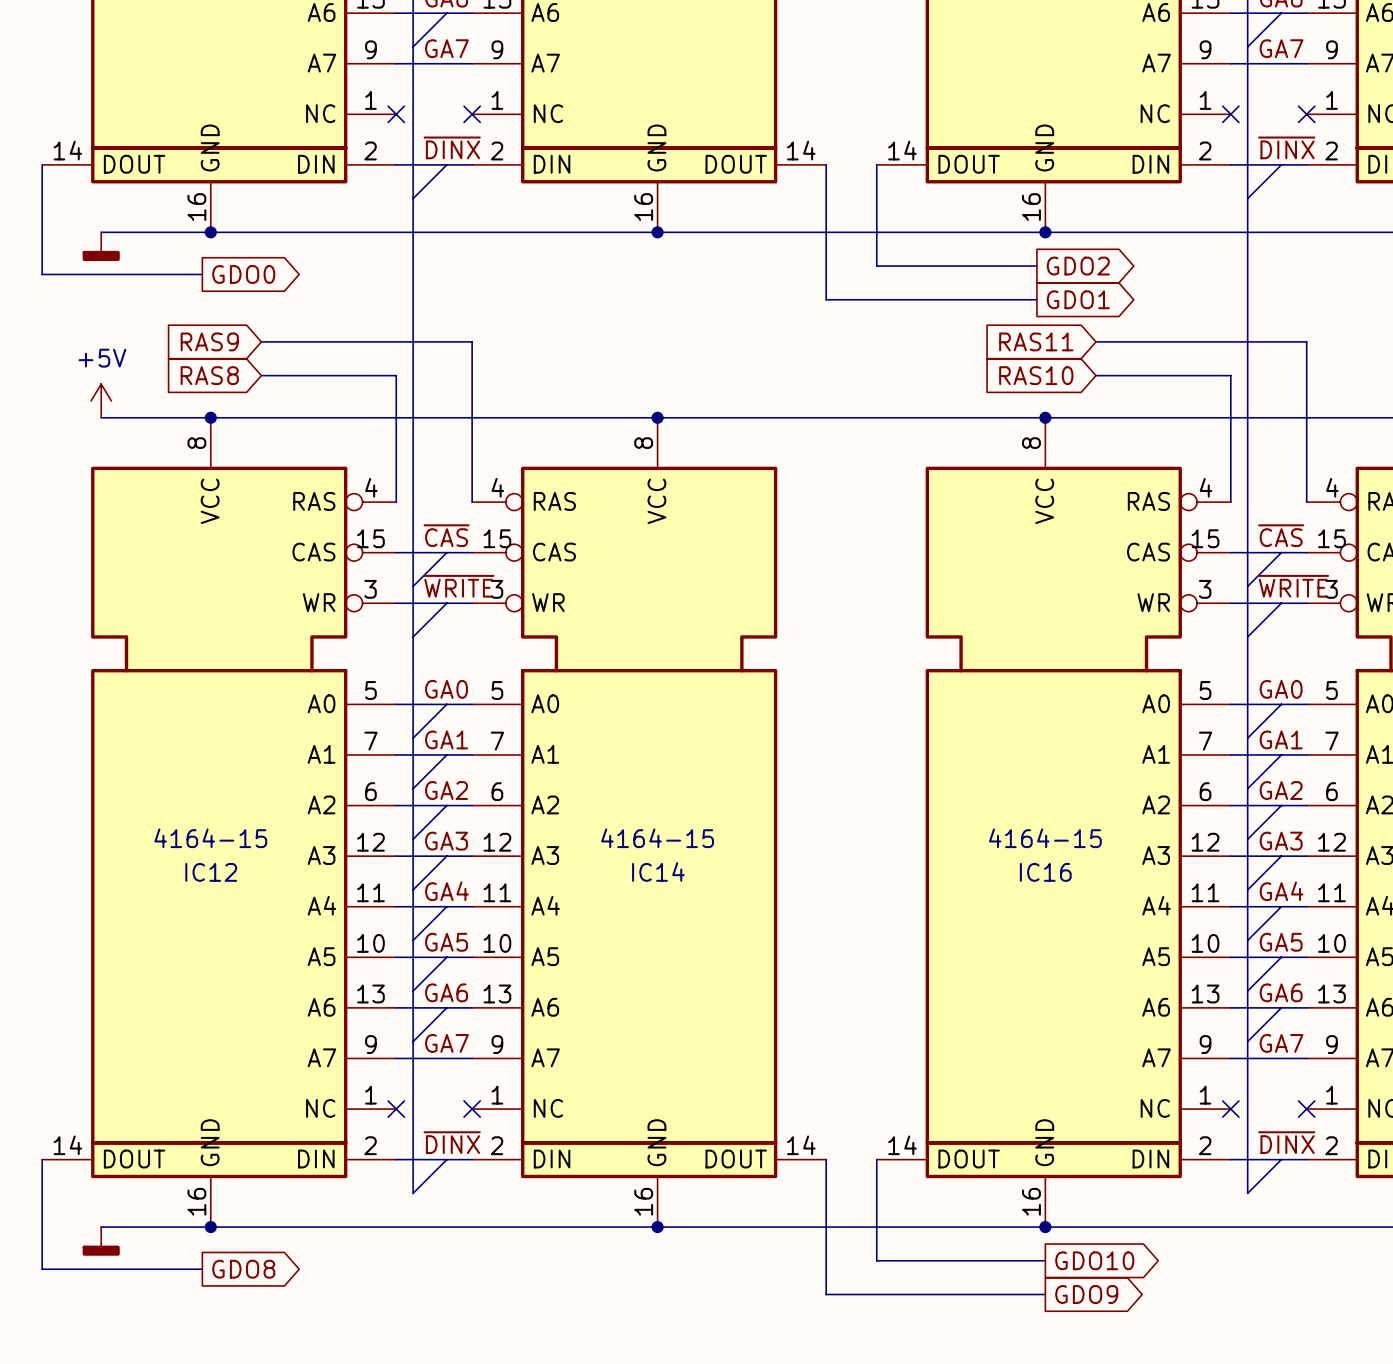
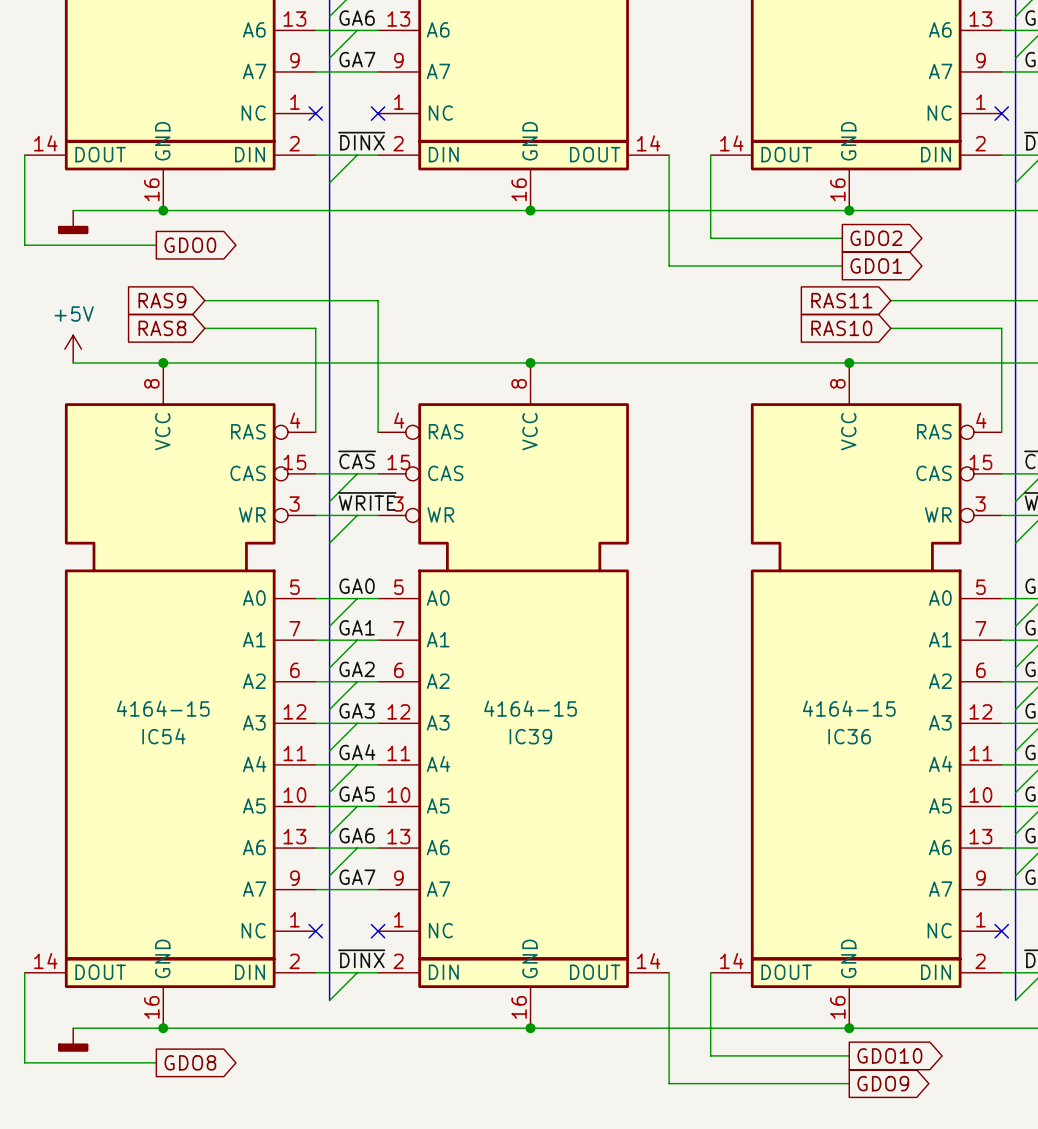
IC14 name: IC14 (658, 871) -> IC39 (530, 736)
IC12 name: IC12 (211, 872) -> IC54 (163, 736)
IC16 name: IC16 (1045, 872) -> IC36 (849, 736)

